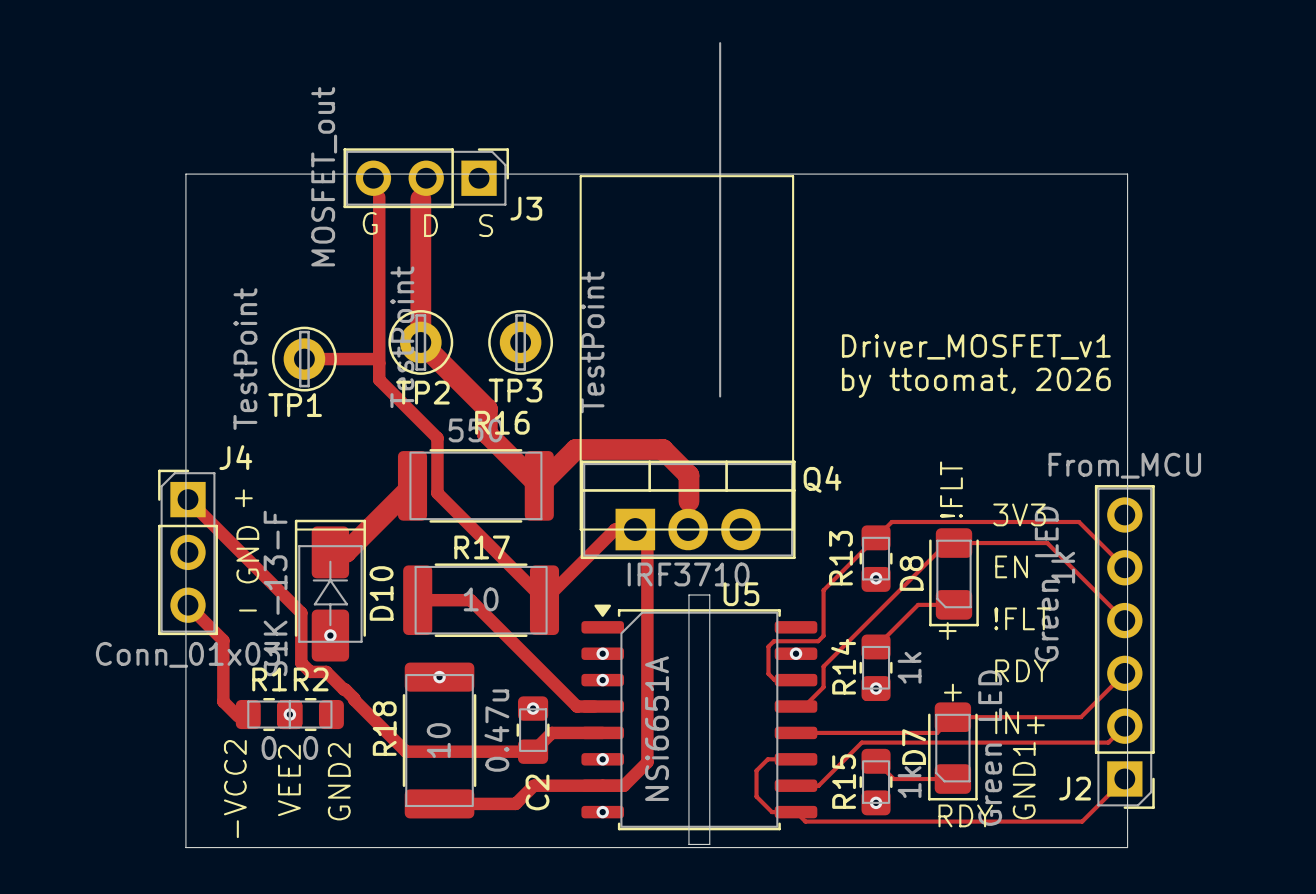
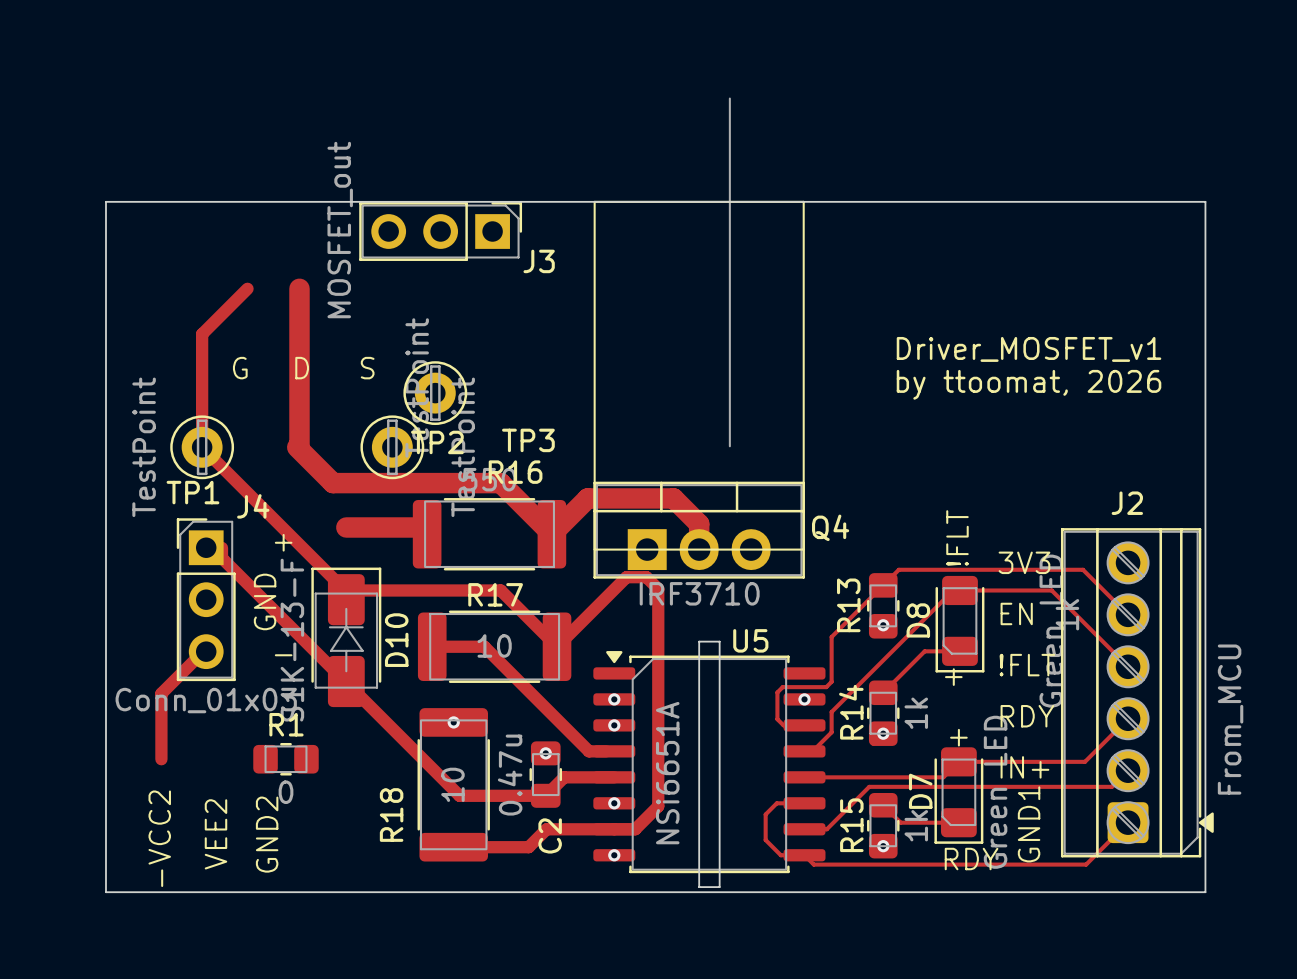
board edge: (185, 174) (1127, 174) (1127, 847) (185, 847) (185, 174) -> (105, 201) (105, 892) (1205, 892) (1205, 201) (105, 201)
line: (580, 176) (793, 176) (793, 529) (580, 529) (580, 176) -> (594, 201) (803, 201) (803, 549) (594, 549) (594, 201)
track: (379, 196) (379, 379) (437, 438) (437, 493) (487, 543) -> (247, 288) (202, 334) (202, 447) (345, 590) (500, 590)
track: (420, 199) (420, 342) (487, 408) (487, 433) -> (299, 288) (299, 445) (297, 447) (333, 483) (500, 483)
text position: G (370, 223) -> G (240, 368)
text position: D (431, 225) -> D (302, 368)
text position: S (486, 225) -> S (367, 368)
TP3 position: (520, 342) -> (392, 447)
text position: Driver_MOSFET_v1 (976, 346) -> Driver_MOSFET_v1 (1029, 349)
track: (304, 359) (375, 359) (379, 363) -> none
TP1 position: (304, 359) -> (202, 447)
text position: by ttoomat, 2026 (976, 382) -> by ttoomat, 2026 (1029, 384)
J2 value position: From_MCU (1124, 465) -> From_MCU (1230, 719)
track: none -> (346, 527) (420, 527)
track: (412, 485) (345, 552) (330, 552) -> none
J2 footprint: [1094, 485, 1155, 809] -> [1060, 528, 1214, 858]
text position: + (243, 498) -> + (283, 542)
track: (197, 508) (301, 612) (301, 662) (310, 671) (326, 671) (406, 751) (445, 751) -> (203, 547) (221, 547) (221, 558) (459, 795)
Q4 position: (688, 509) -> (699, 530)
line: (296, 529) (364, 529) -> none
track: none -> (203, 651) (161, 693) (161, 759)
track: (189, 606) (223, 640) (223, 701) (238, 716) -> none
text position: - (247, 610) -> - (283, 655)
via: (330, 635) -> none
via: (289, 714) -> none
R2: 0 (310, 714) -> none
R18 name position: R18 (384, 728) -> R18 (391, 815)
text position: VEE2 (289, 780) -> VEE2 (215, 834)
text position: GND2 (339, 781) -> GND2 (267, 834)
J2 name position: J2 (1075, 788) -> J2 (1127, 503)
text position: -VCC2 (235, 789) -> -VCC2 (159, 838)

